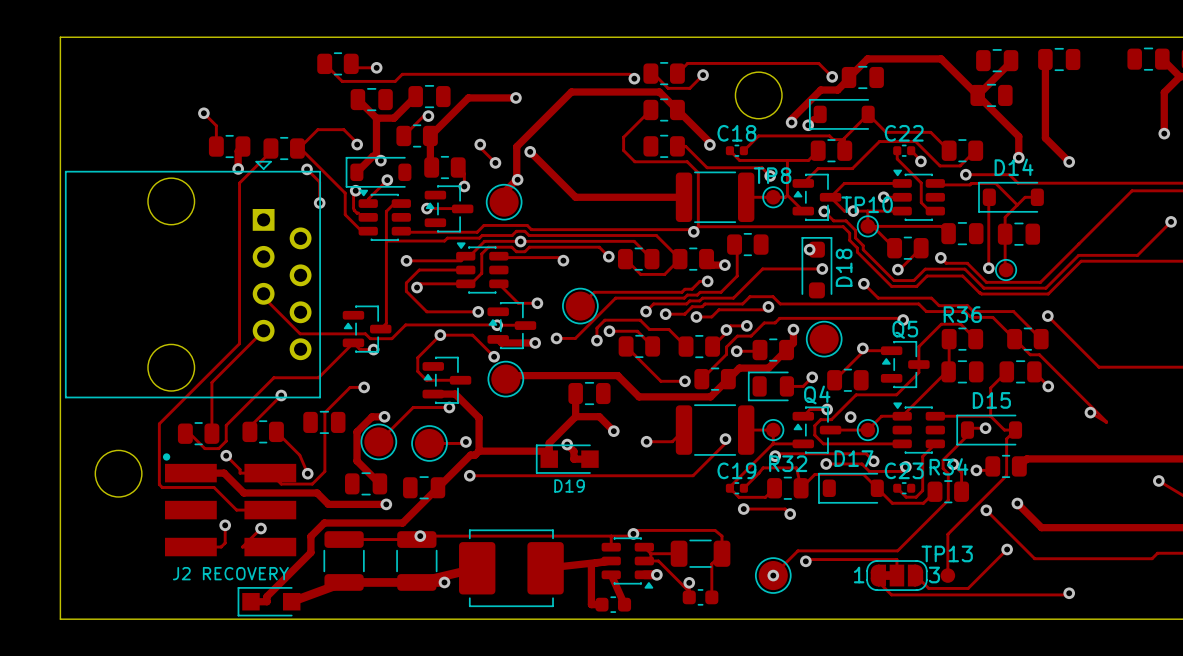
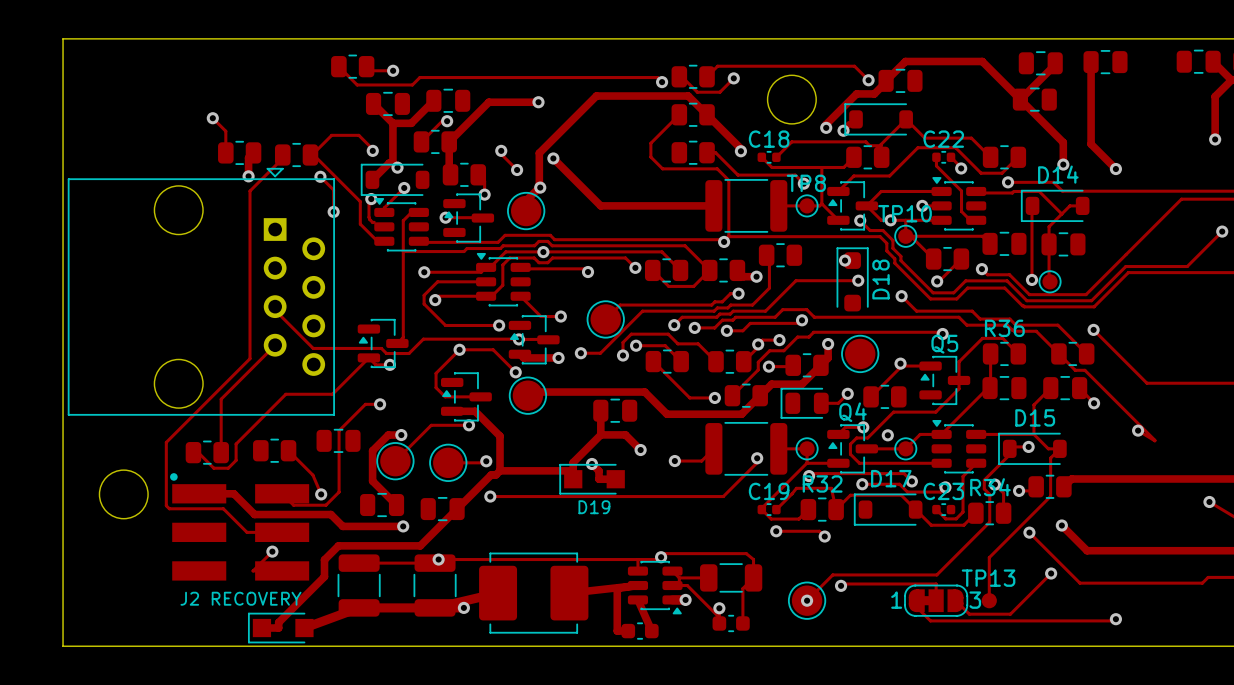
track: (281, 395) (249, 426) (249, 431) -> none
via: (281, 395) -> none
track: (226, 455) (240, 469) (240, 473) (270, 473) -> none
via: (226, 455) -> none
track: (225, 525) (225, 543) (221, 547) (190, 547) -> none
via: (225, 525) -> none

